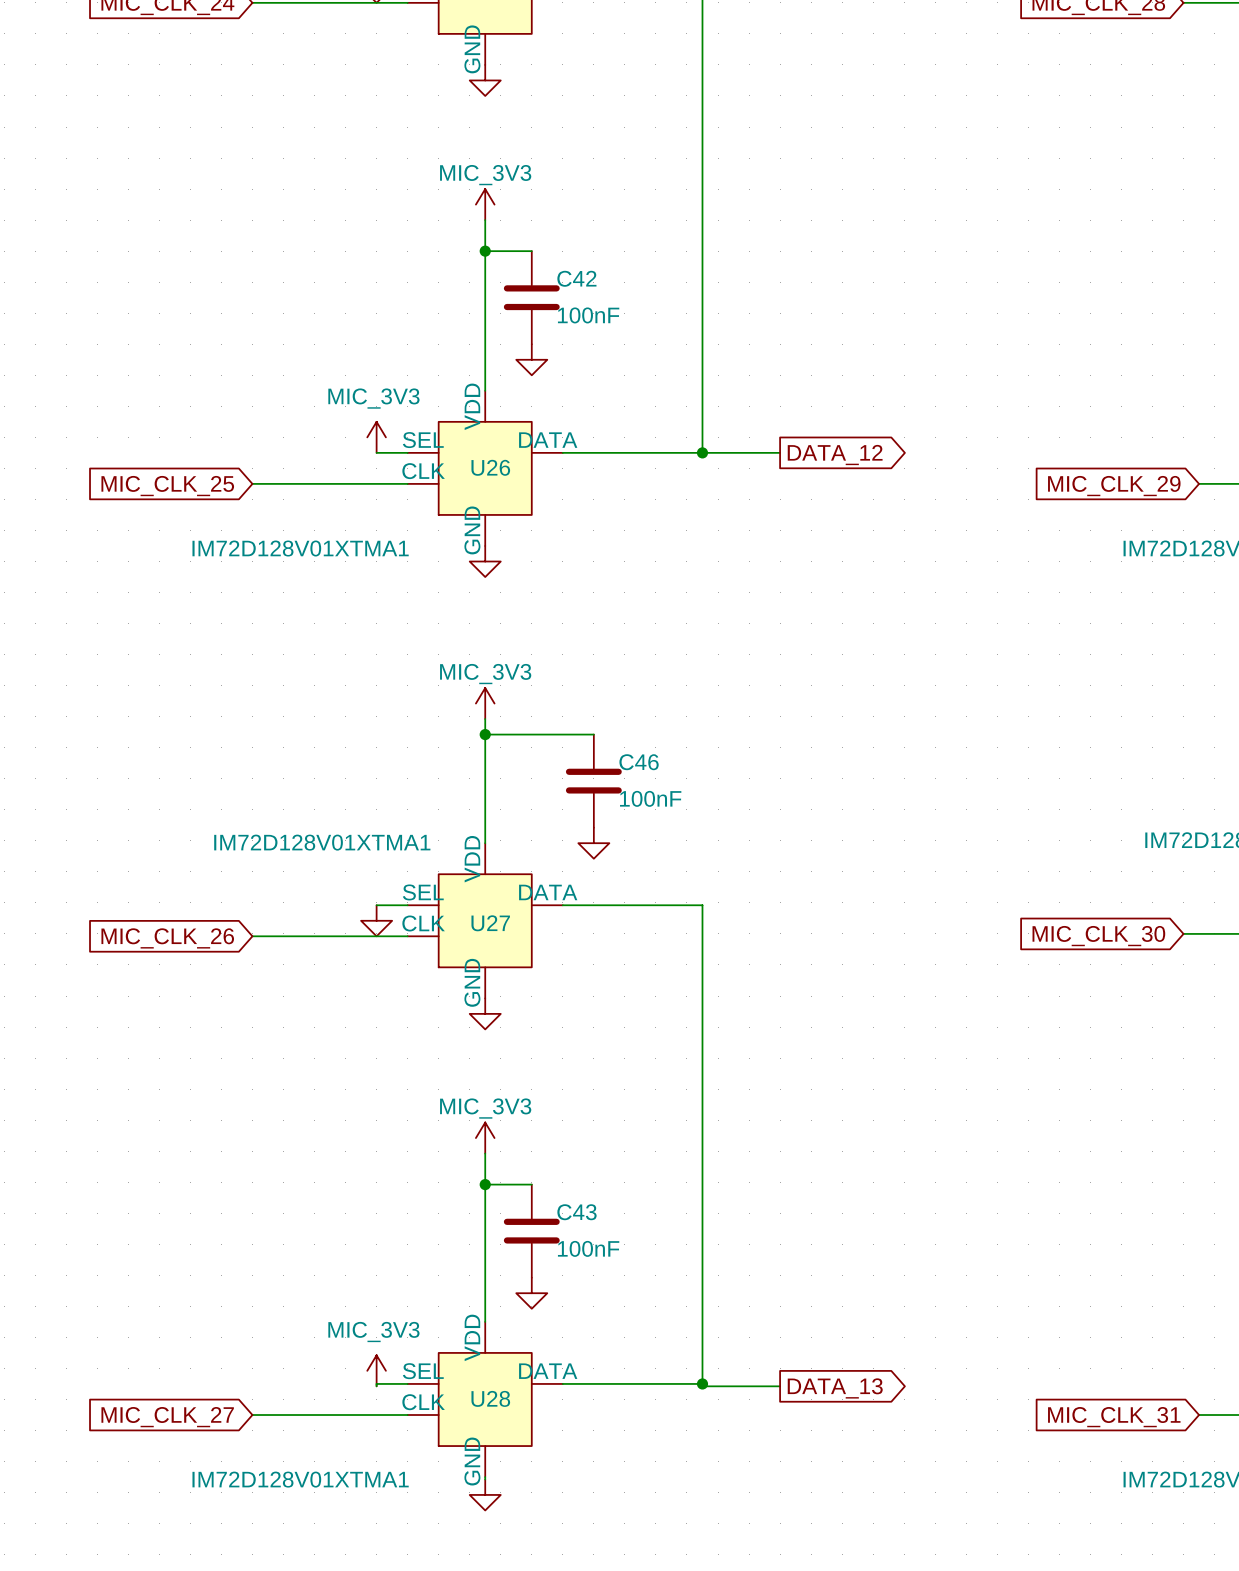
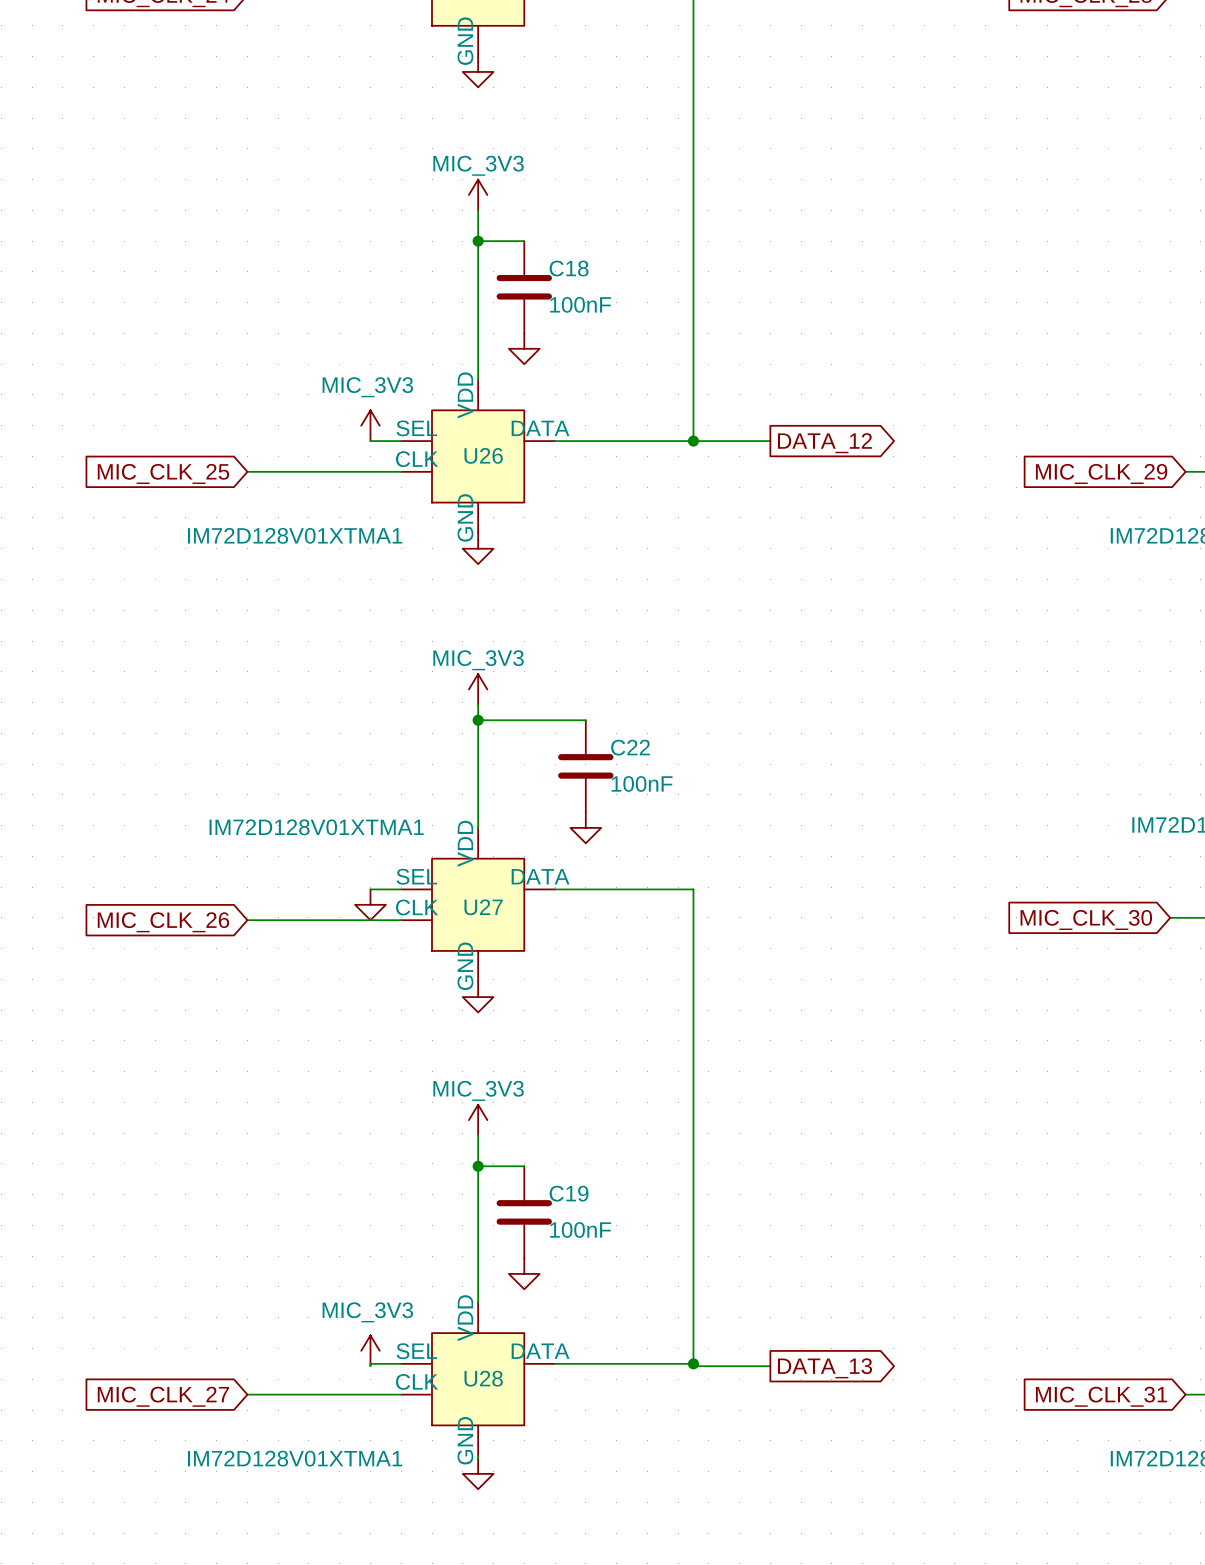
C42 name: C42 (576, 278) -> C18 (569, 268)
C46 name: C46 (639, 762) -> C22 (630, 747)
C43 name: C43 (576, 1212) -> C19 (569, 1193)

